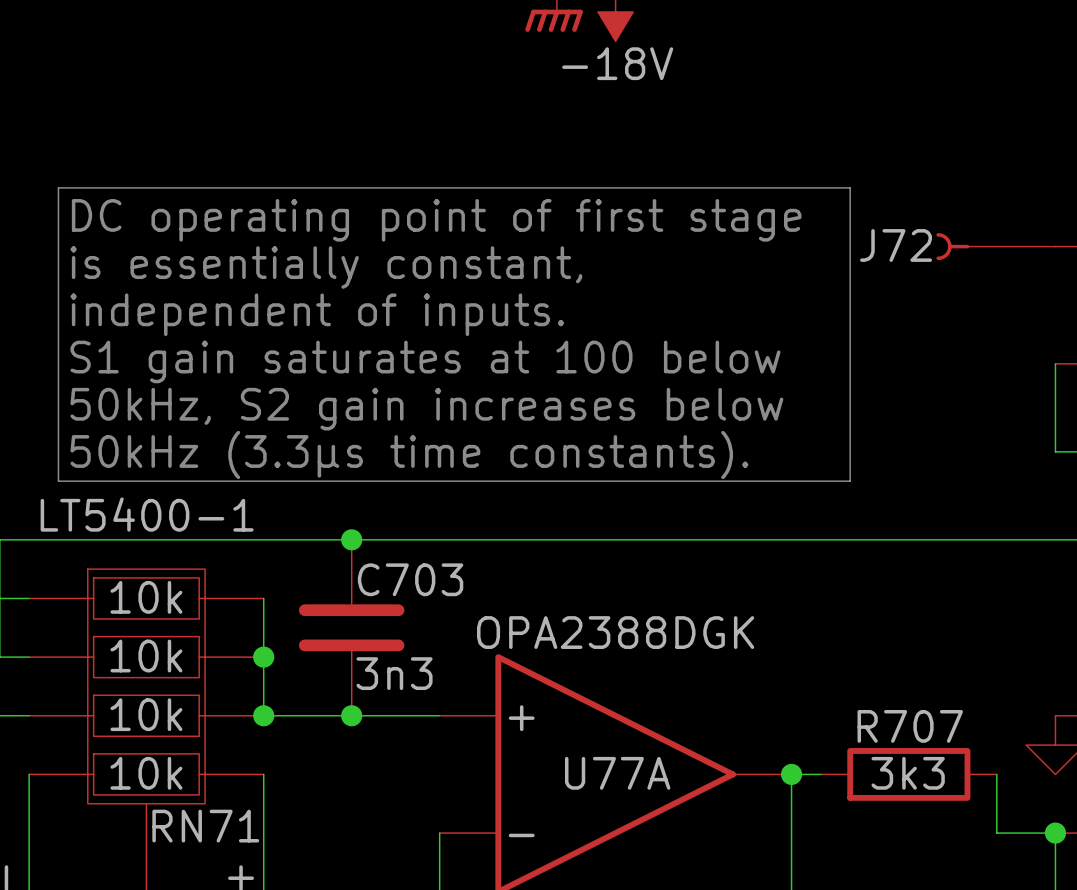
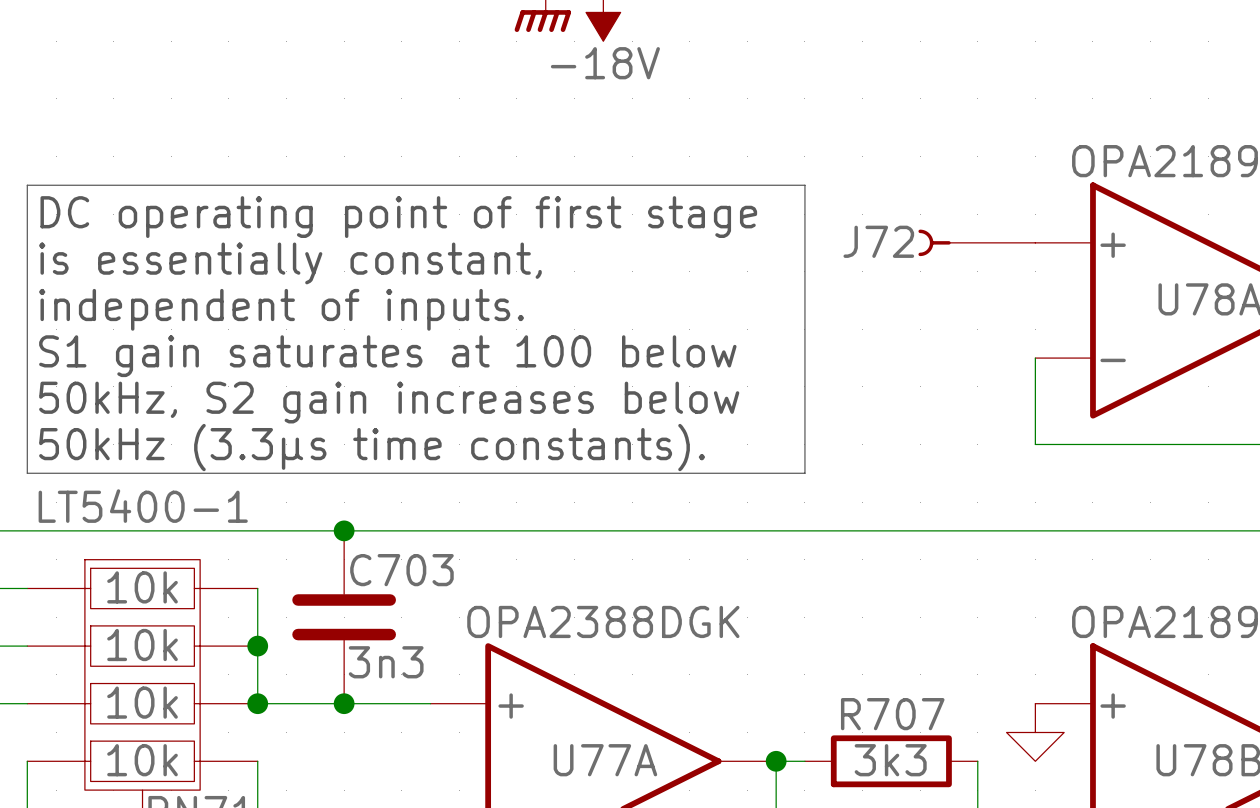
line: (58, 187) (58, 481) -> (56, 185) (27, 185) (27, 473) (56, 473)
line: (820, 187) (850, 187) (850, 481) (820, 481) -> (804, 185) (804, 473)
text position: DC operating point of first stage (436, 220) -> DC operating point of first stage (398, 217)
text position: is essentially constant, (326, 267) -> is essentially constant, (290, 263)
text position: independent of inputs. (317, 314) -> independent of inputs. (281, 309)
text position: S1 gain saturates at 100 below (425, 361) -> S1 gain saturates at 100 below (387, 356)
text position: 50kHz, S2 gain increases below (426, 409) -> 50kHz, S2 gain increases below (389, 402)
text position: 50kHz (3.3µs time constants). (409, 454) -> 50kHz (3.3µs time constants). (372, 447)

